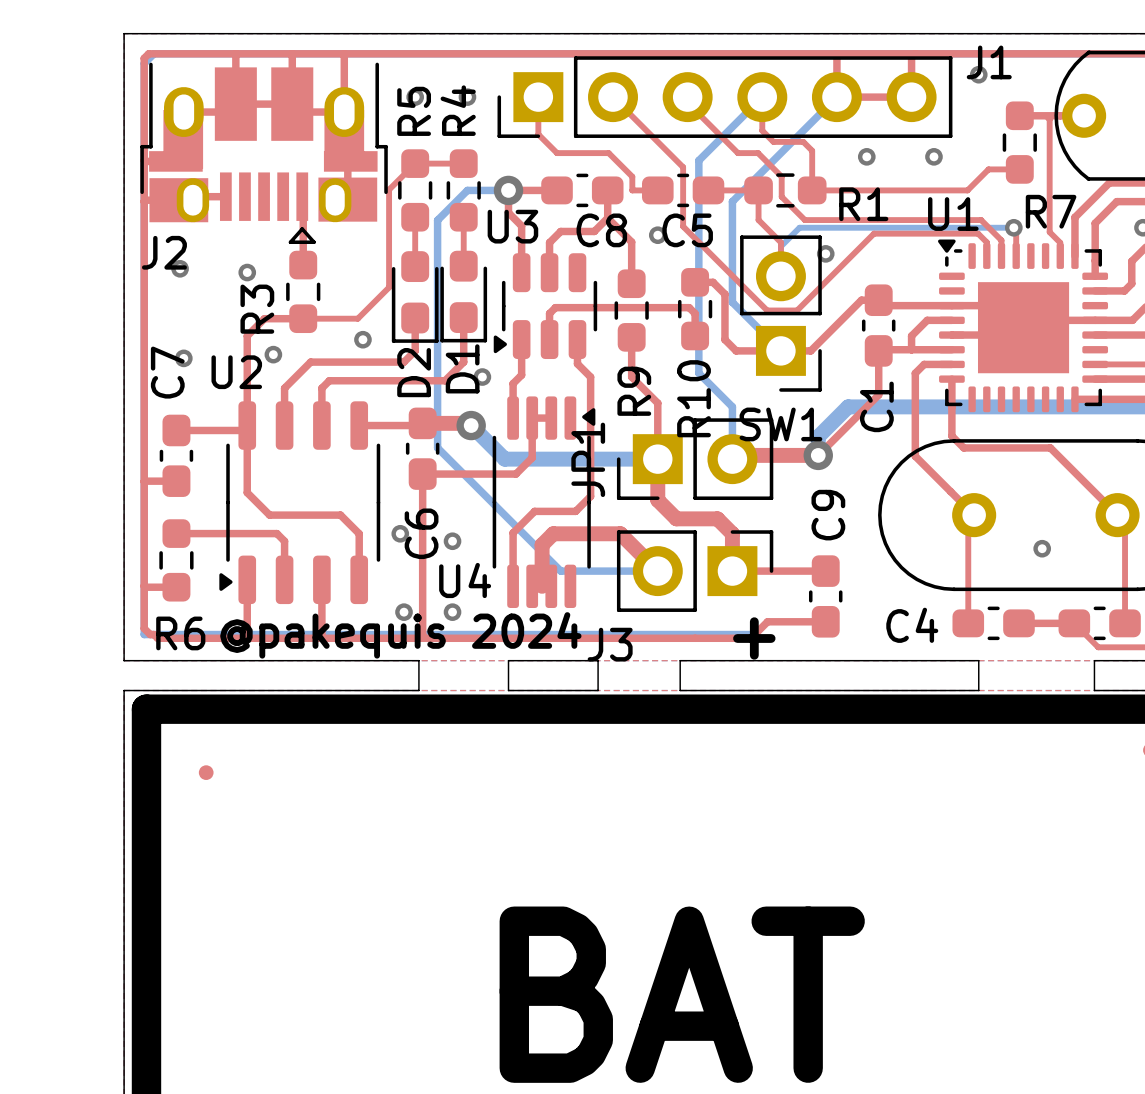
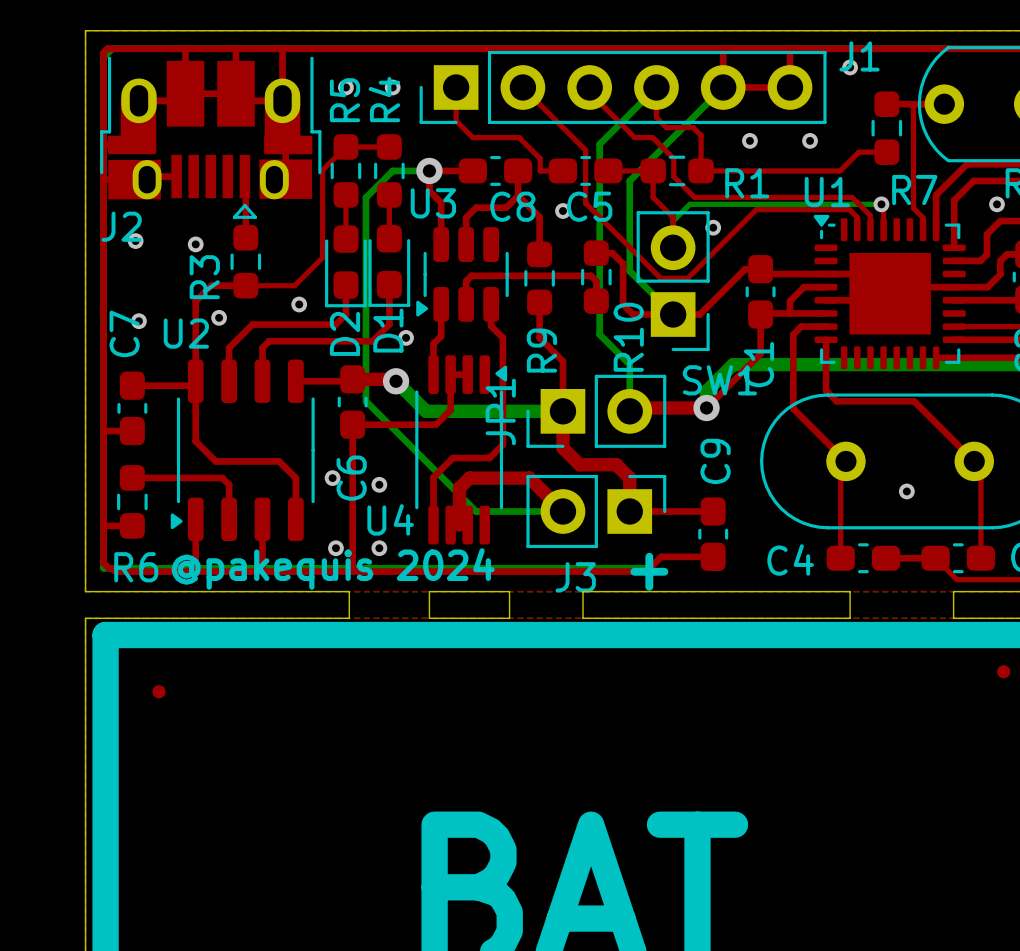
R10 name position: R10 (694, 398) -> R10 (628, 337)
SW1 name position: SW1 (780, 424) -> SW1 (719, 380)
J3 name position: J3 (610, 644) -> J3 (575, 577)

